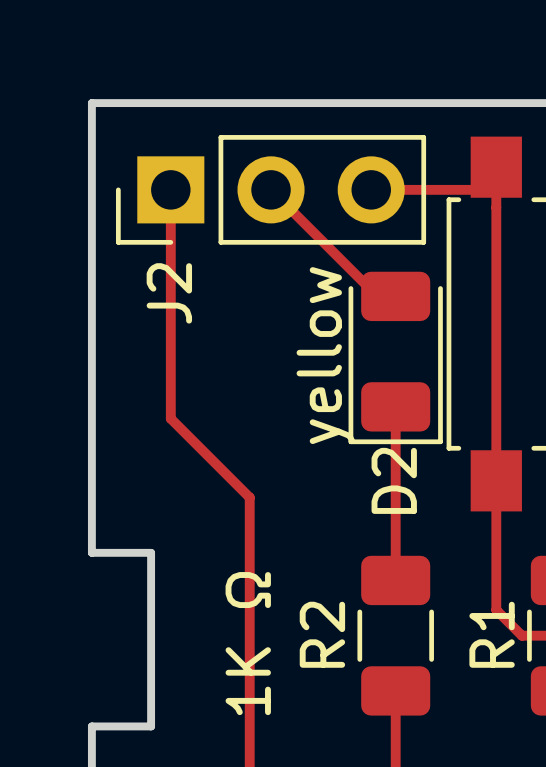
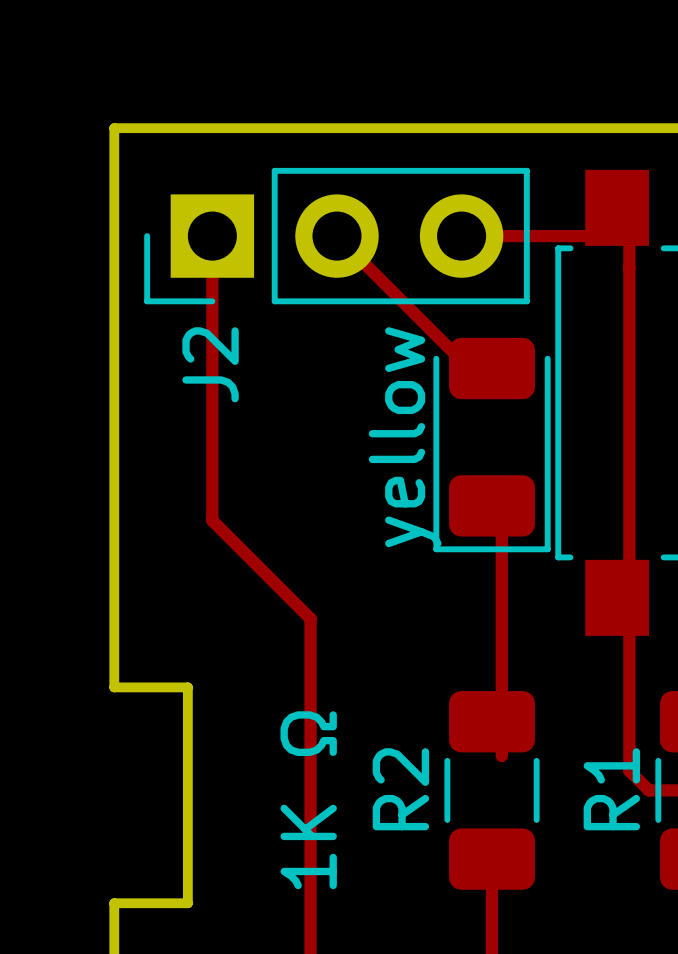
track: (473, 189) (496, 167) (496, 610) (506, 619) -> (629, 216) (629, 770)
text: yellow (325, 355) -> none
track: (395, 406) (395, 580) -> none
track: none -> (501, 505) (501, 756)
D2 name: D2 (394, 480) -> yellow (405, 437)

